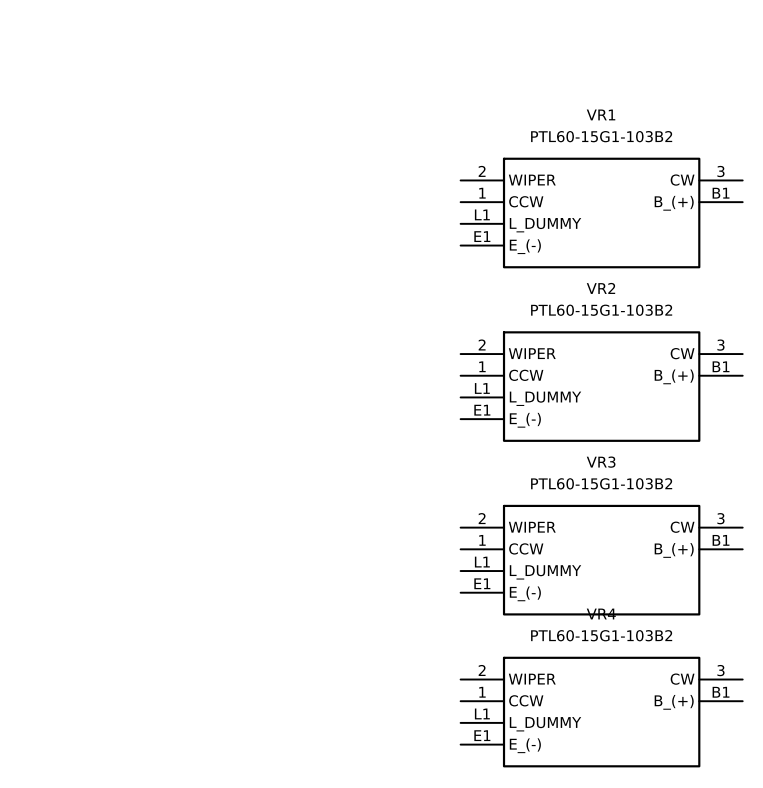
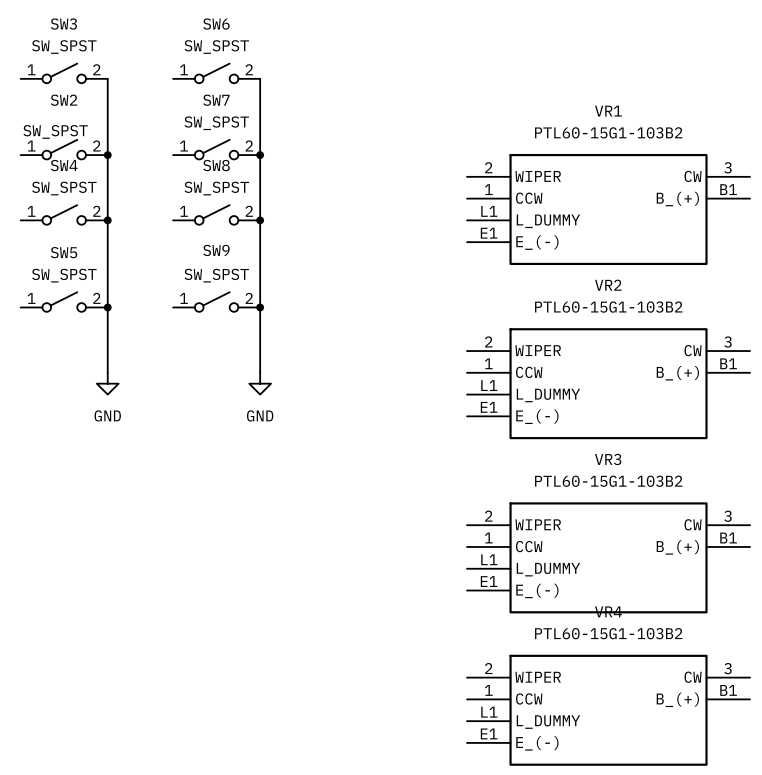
SW3: none -> SW_SPST (64, 73)
SW6: none -> SW_SPST (216, 73)
wire: none -> (107, 78) (107, 372)
wire: none -> (260, 78) (260, 372)
SW2: none -> SW_SPST (64, 149)
SW7: none -> SW_SPST (216, 149)
junction: none -> (107, 155)
junction: none -> (260, 155)
SW4: none -> SW_SPST (64, 214)
SW8: none -> SW_SPST (216, 214)
junction: none -> (107, 220)
junction: none -> (260, 220)
SW5: none -> SW_SPST (64, 302)
SW9: none -> SW_SPST (216, 302)
junction: none -> (107, 307)
junction: none -> (260, 307)
power symbol: none -> GND (107, 383)
power symbol: none -> GND (260, 383)

